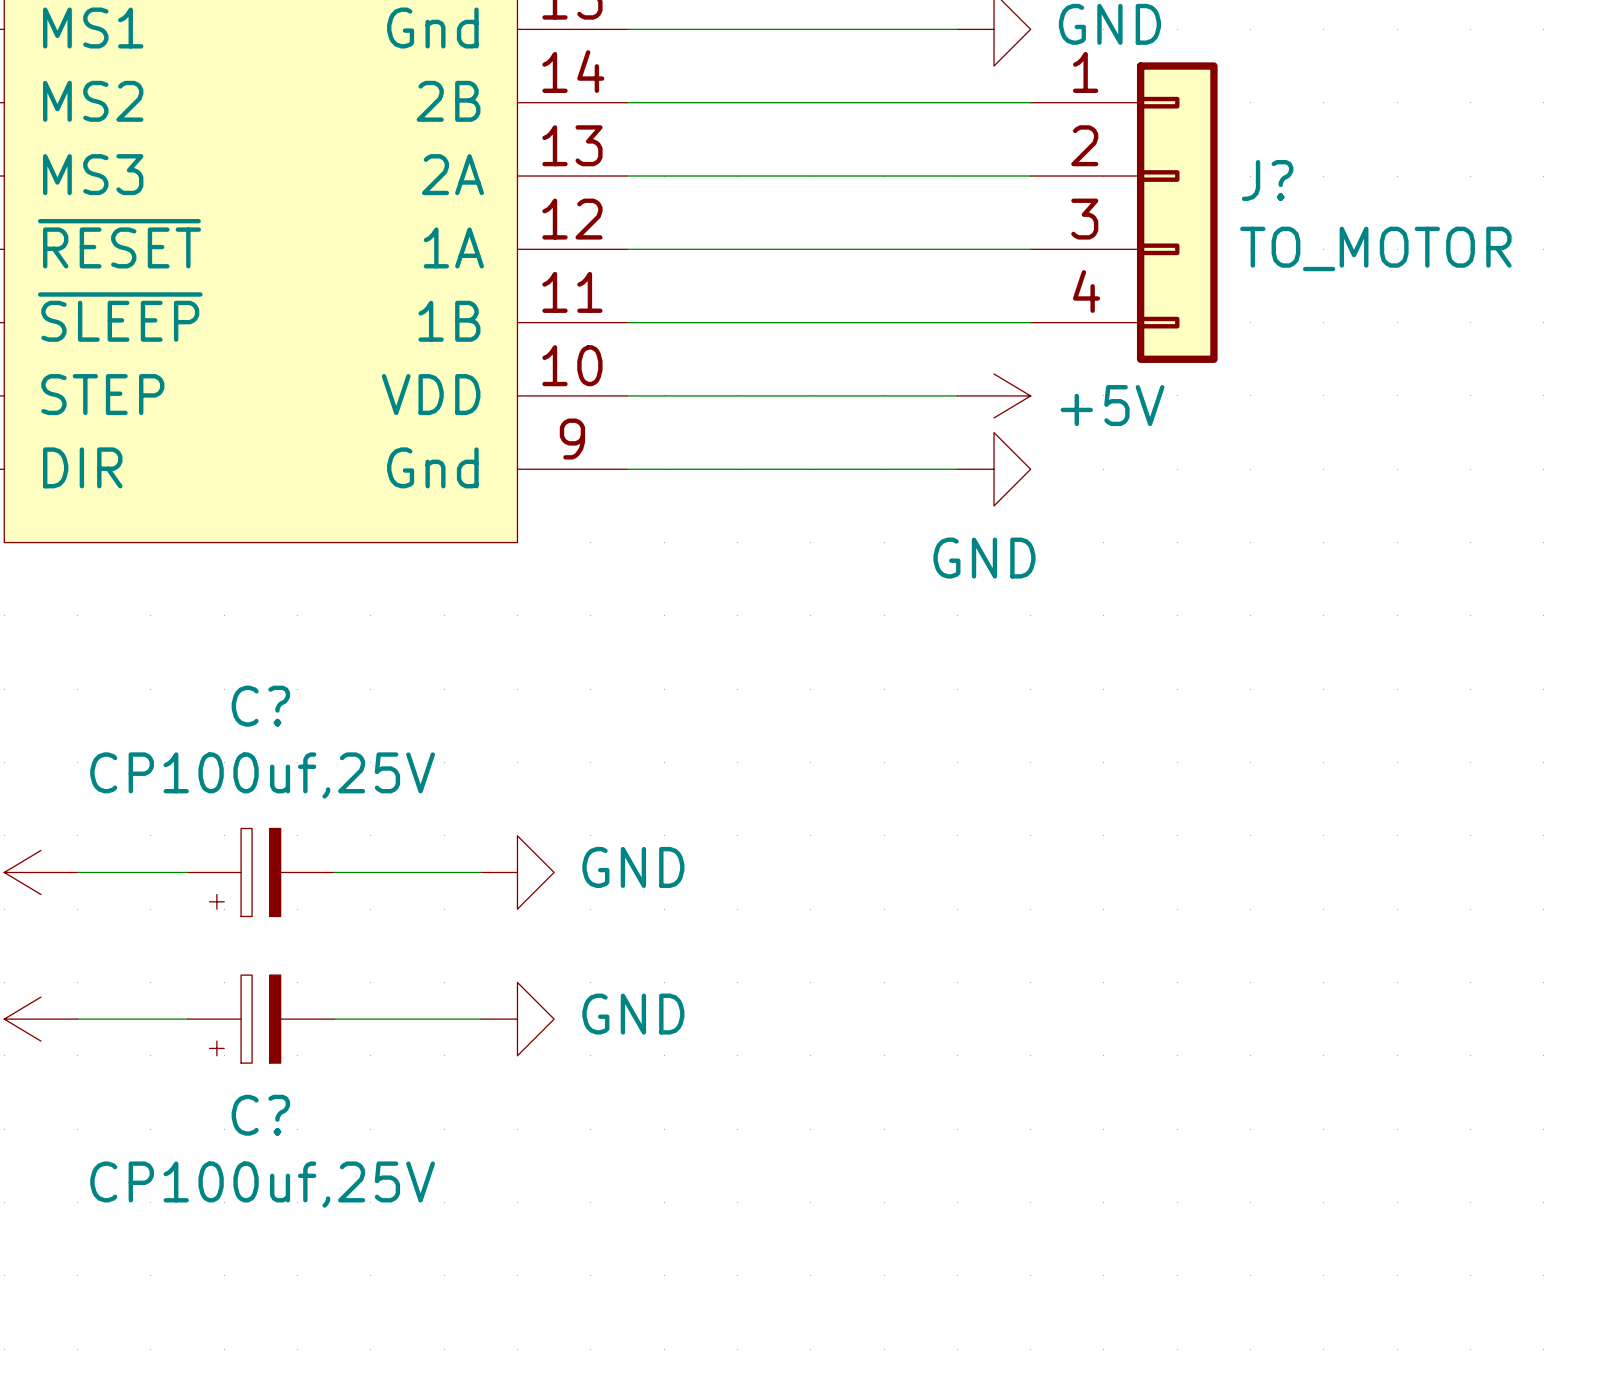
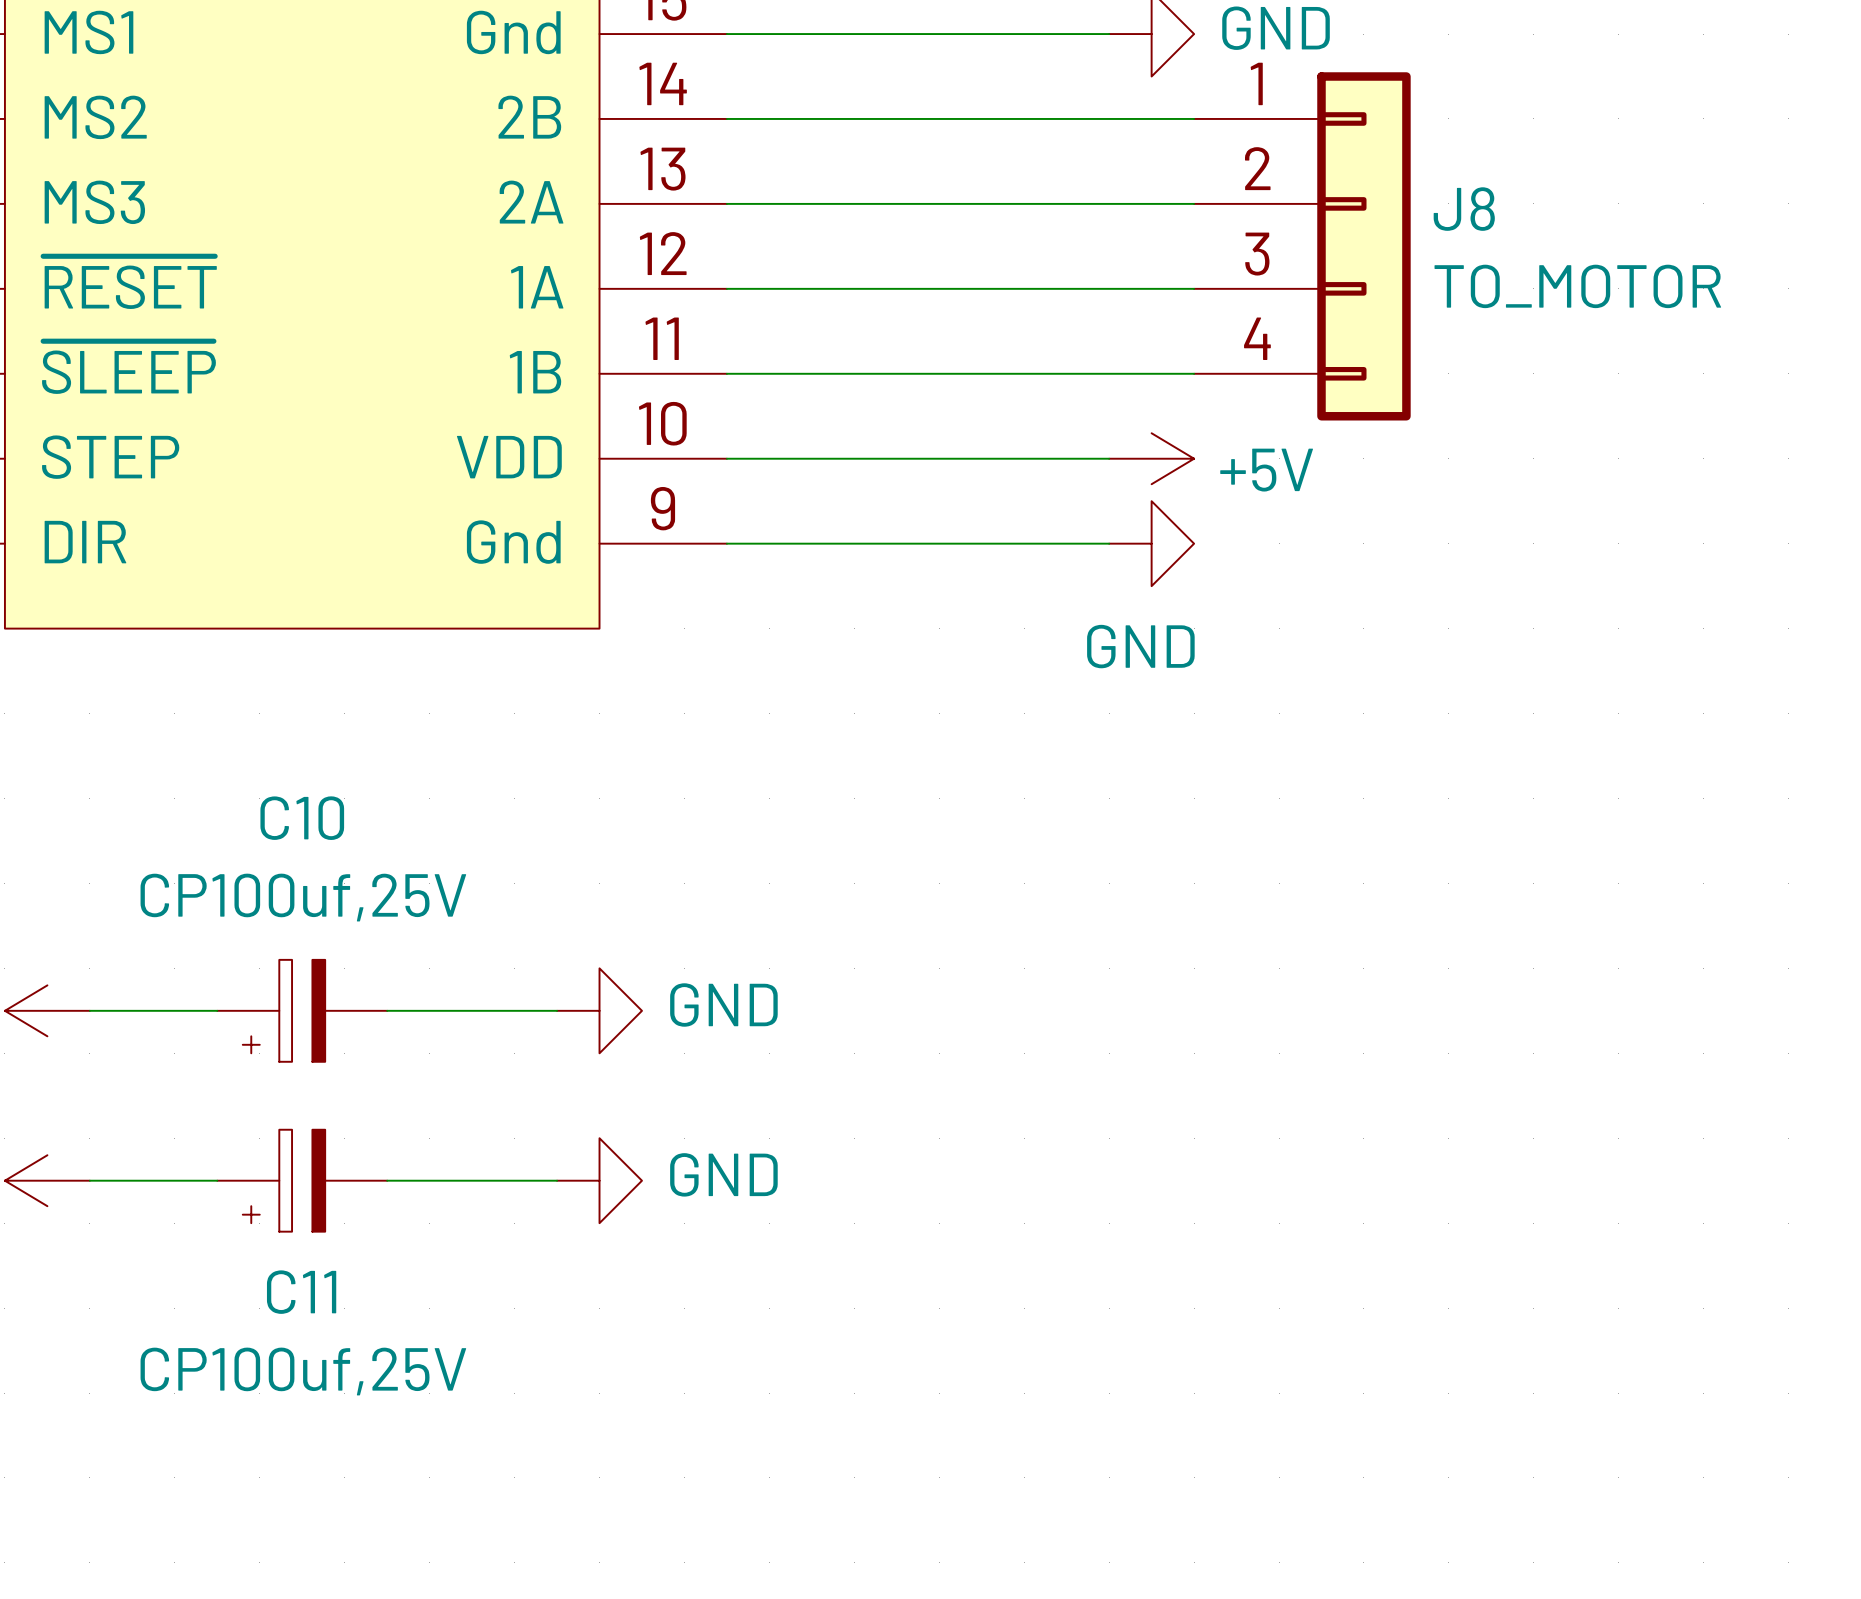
J? name: J? (1267, 180) -> J8 (1464, 209)
C? name: C? (260, 706) -> C10 (302, 818)
C? name: C? (260, 1115) -> C11 (301, 1292)

